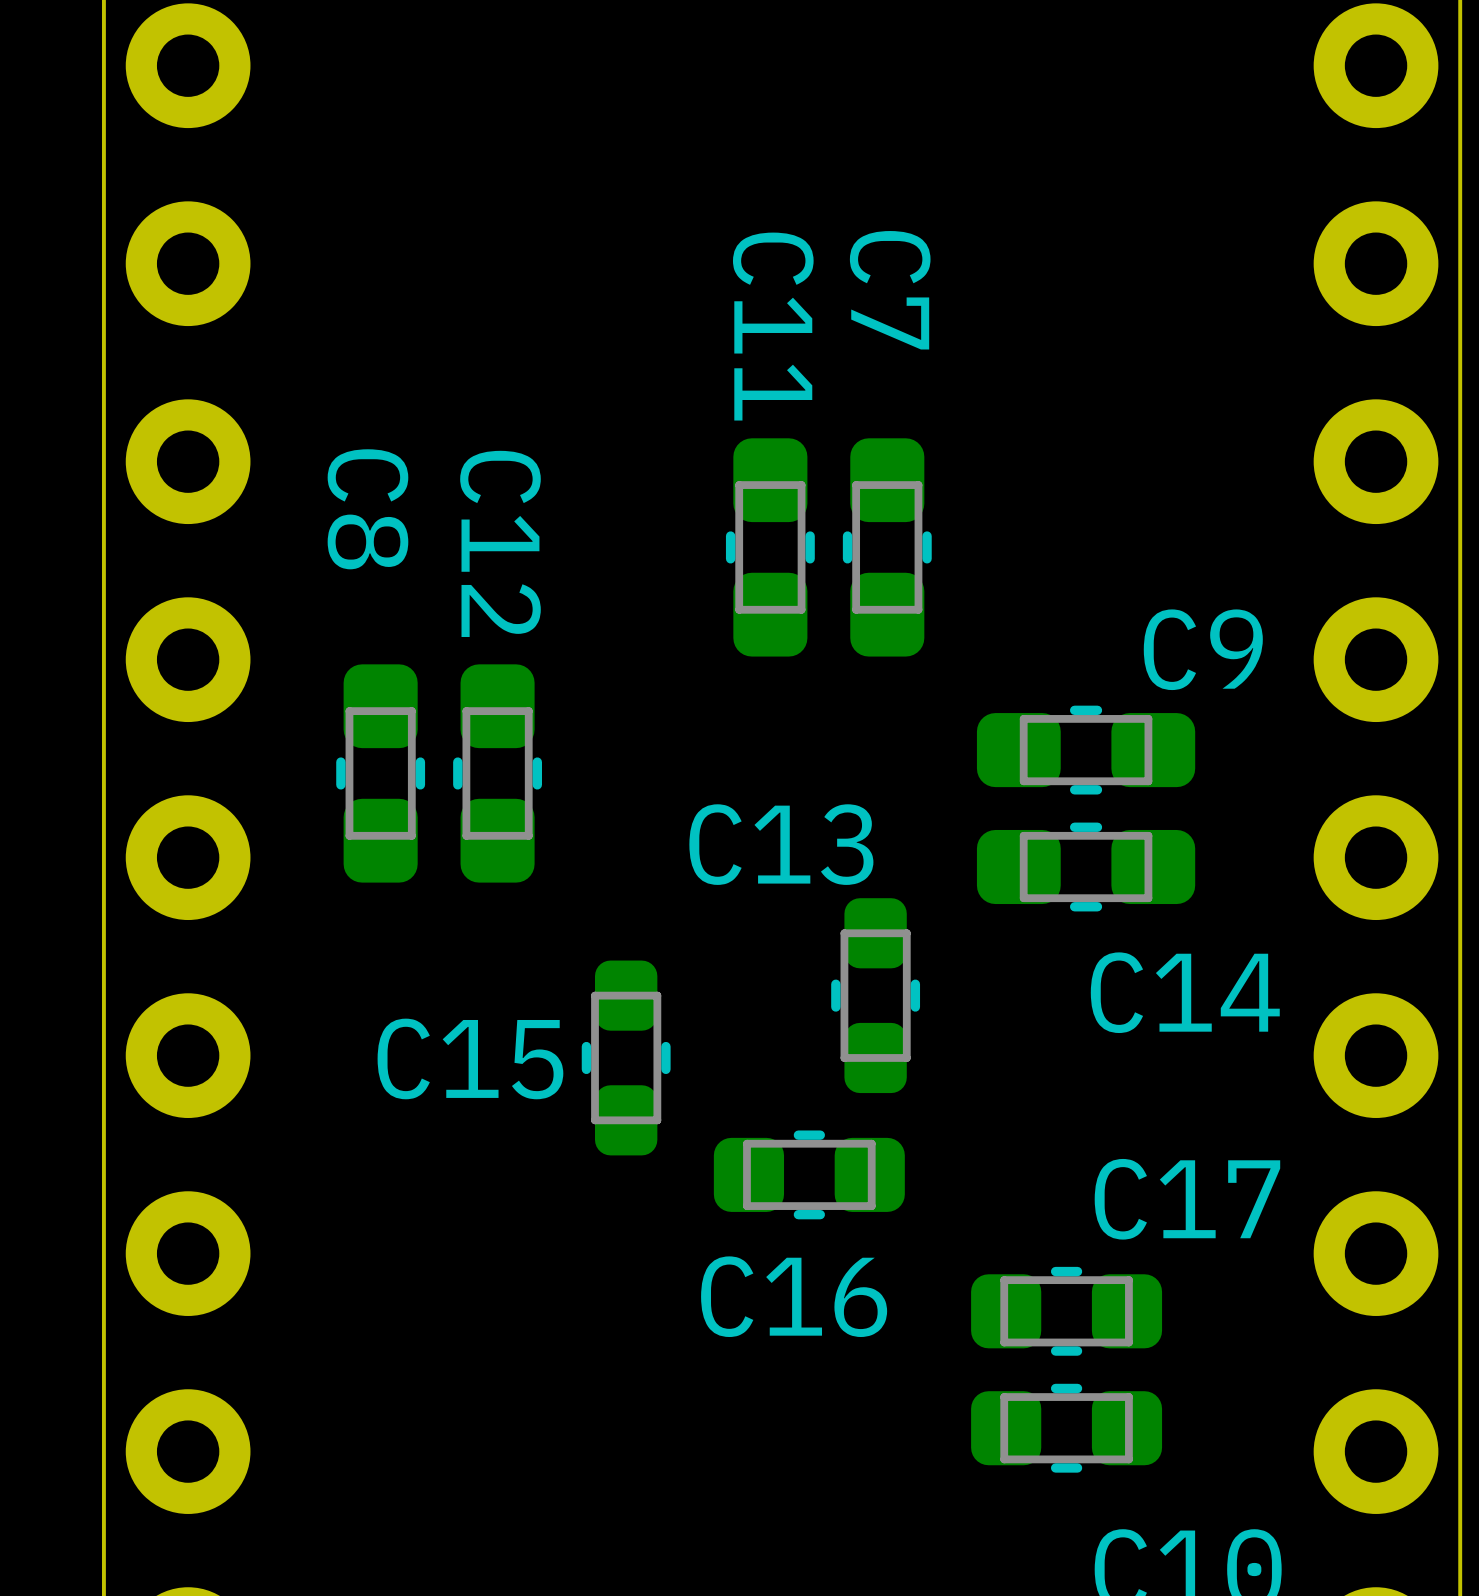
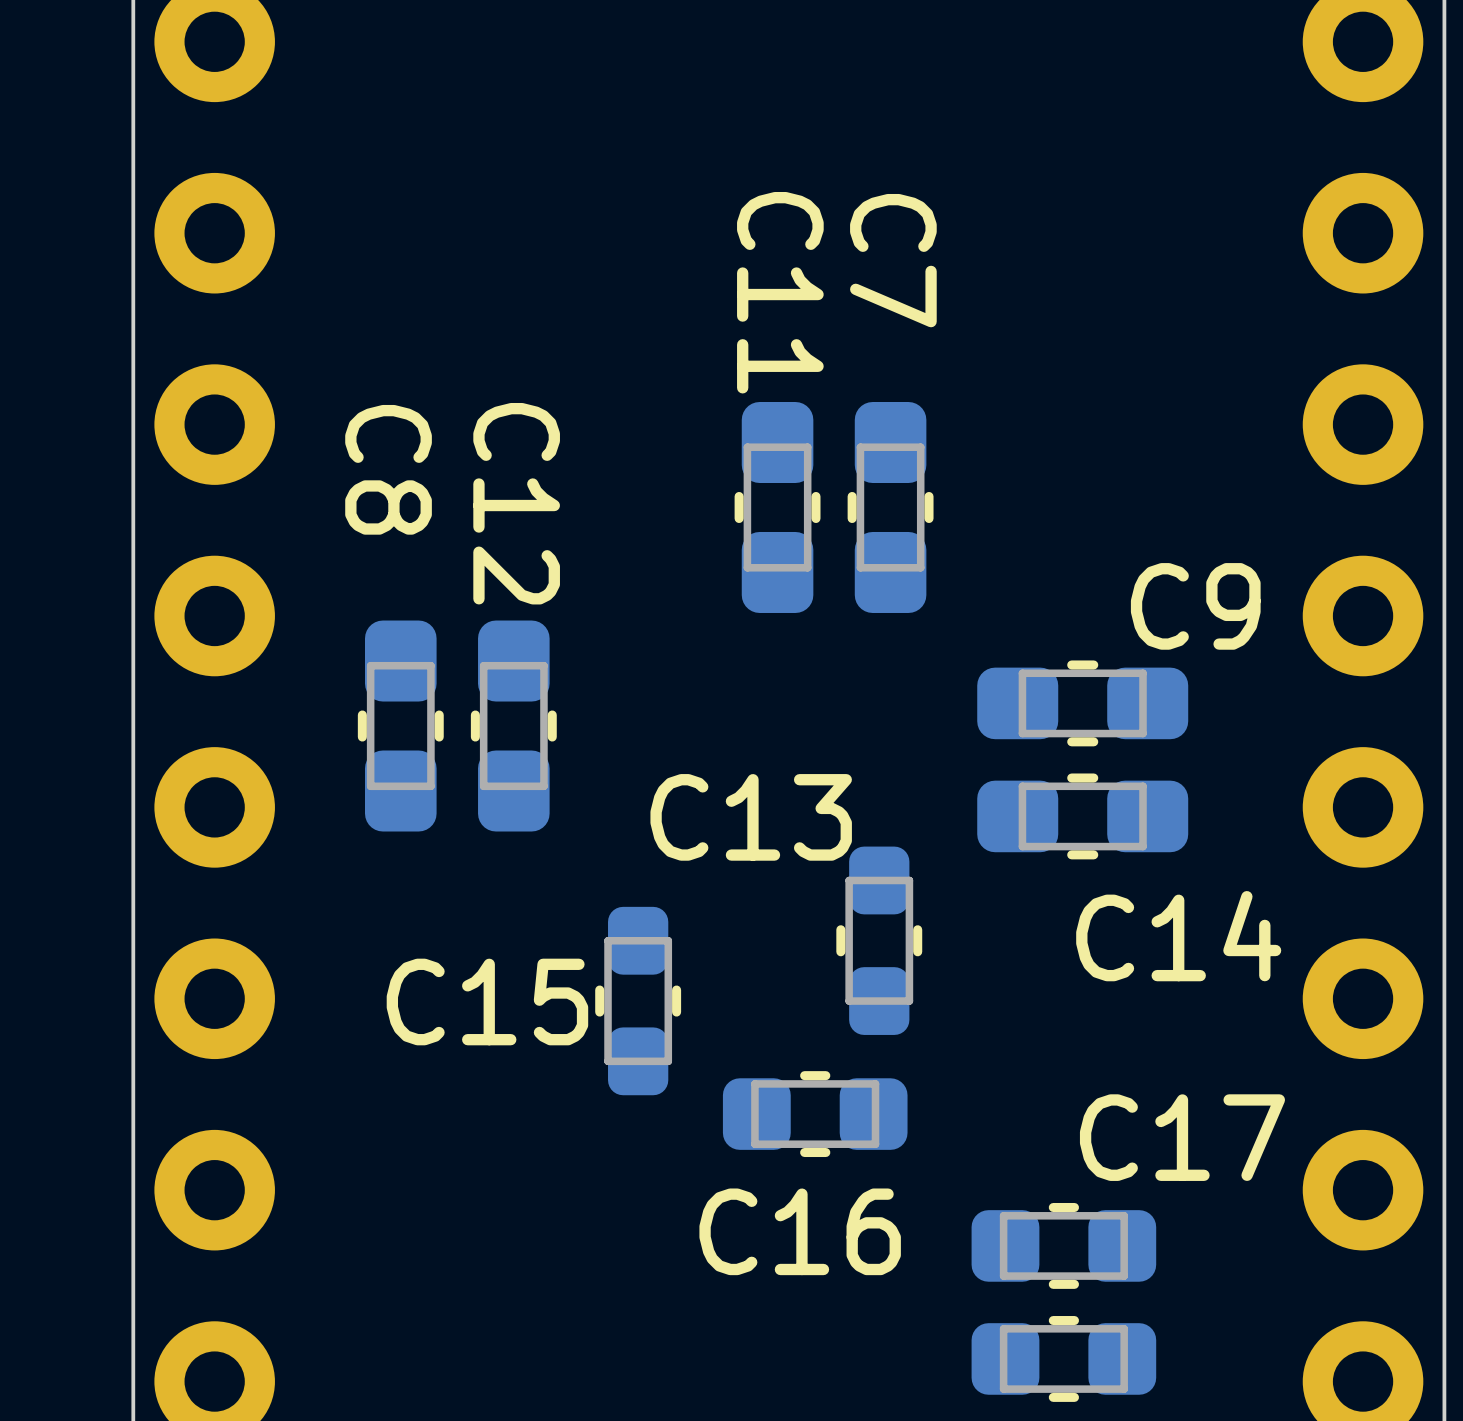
C13 name position: C13 (781, 844) -> C13 (751, 817)

